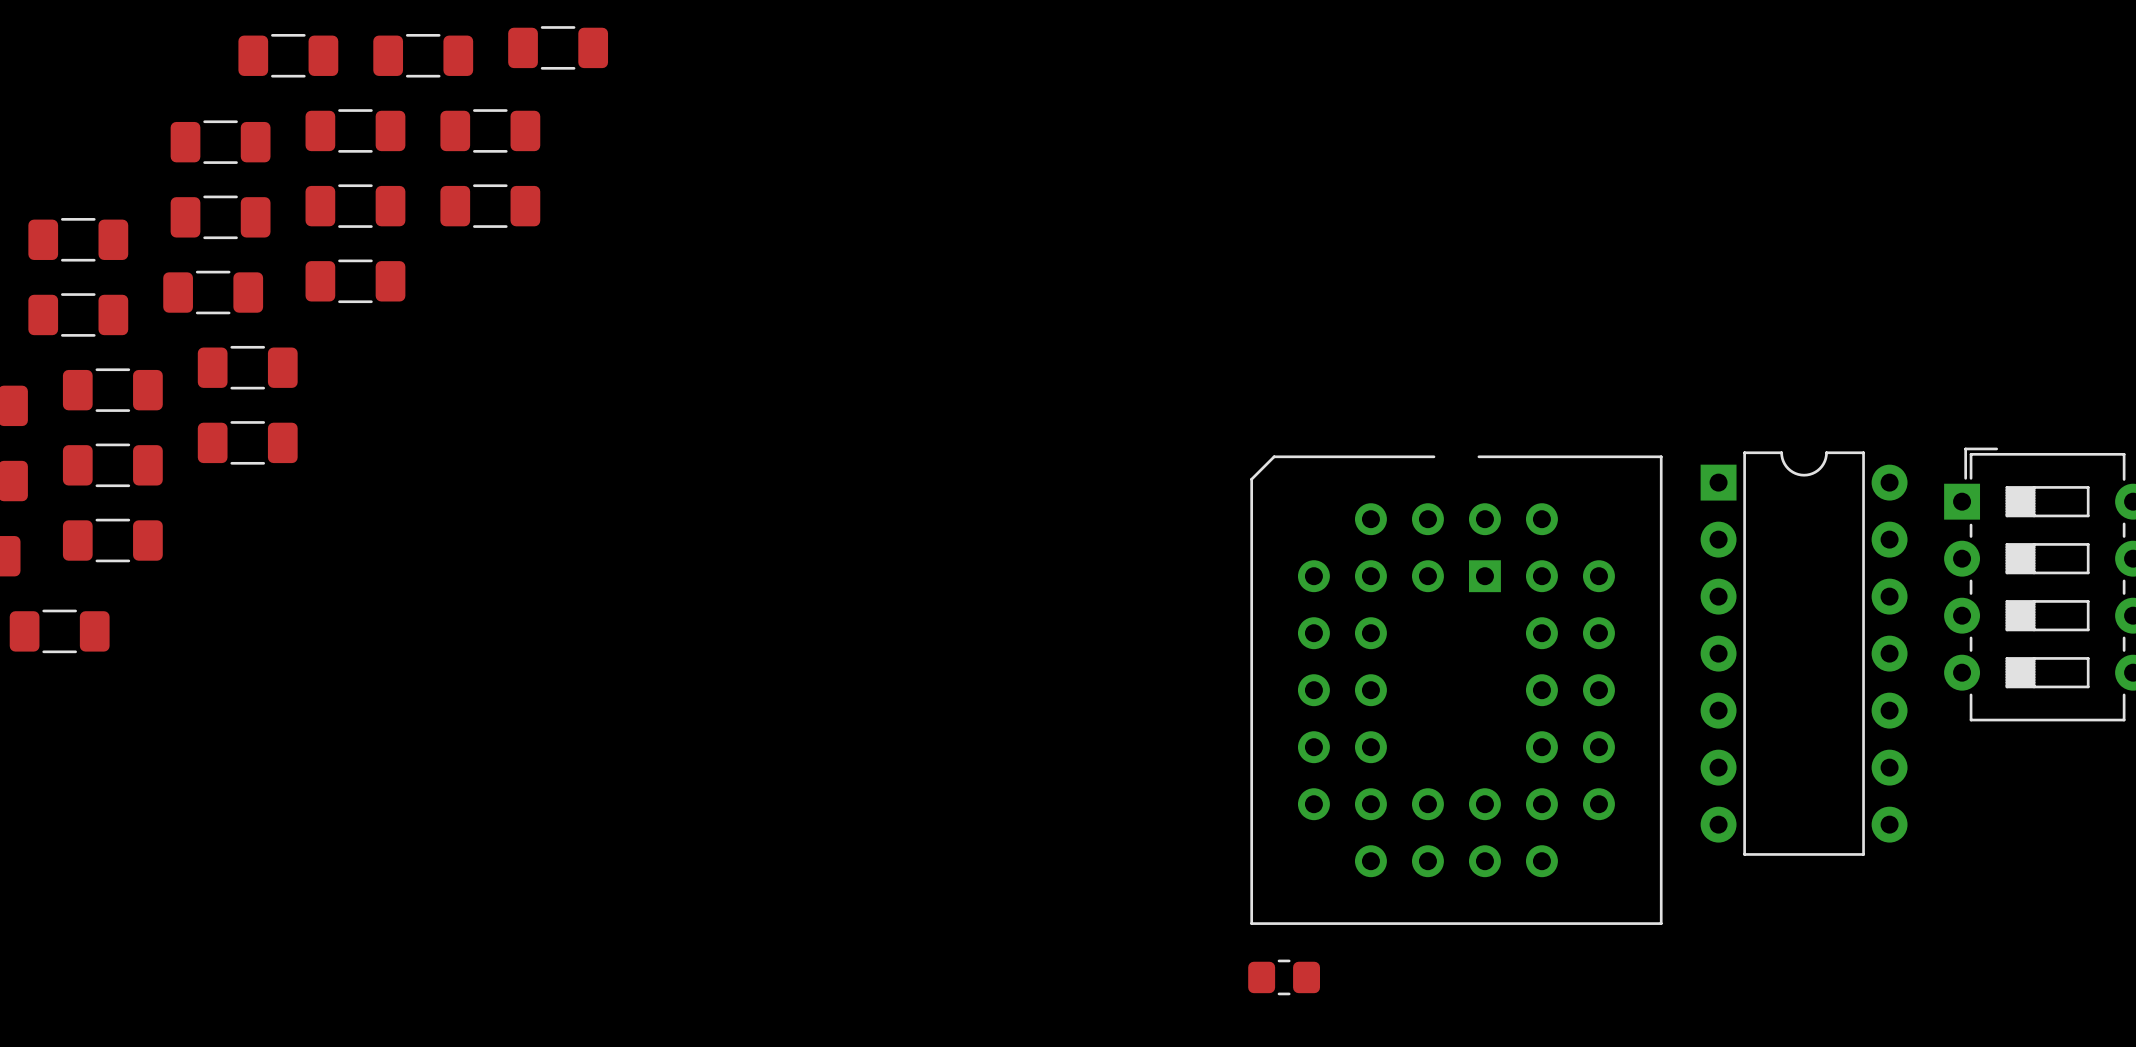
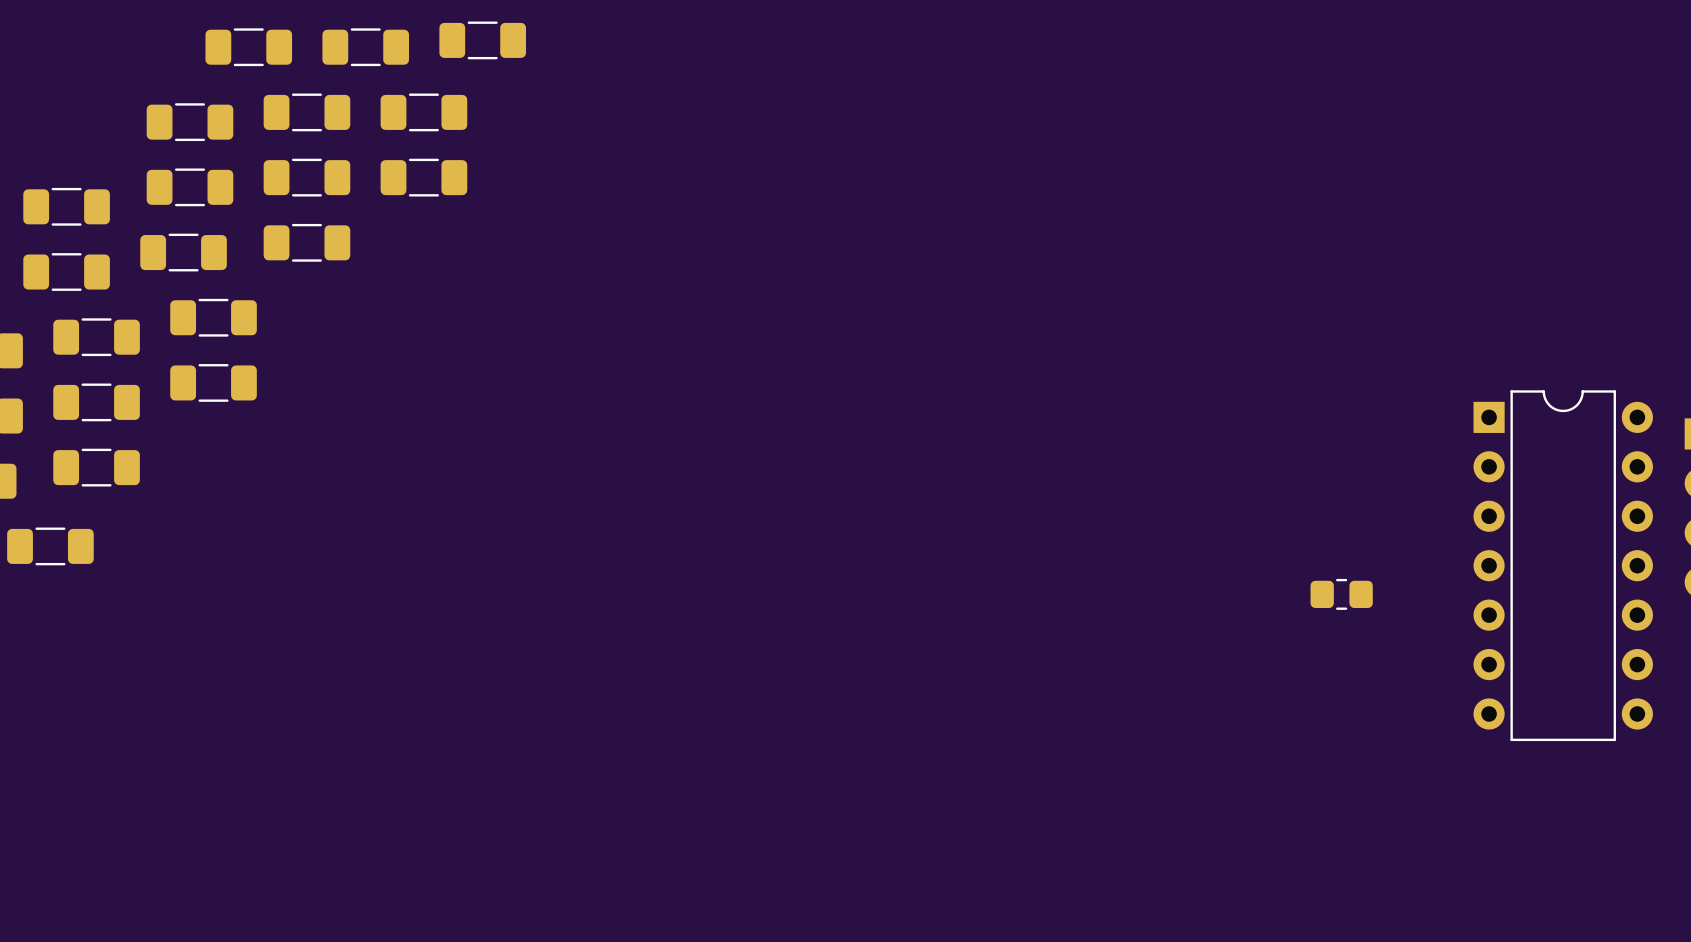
part: (1456, 690) -> none
part position: (1284, 977) -> (1341, 594)

